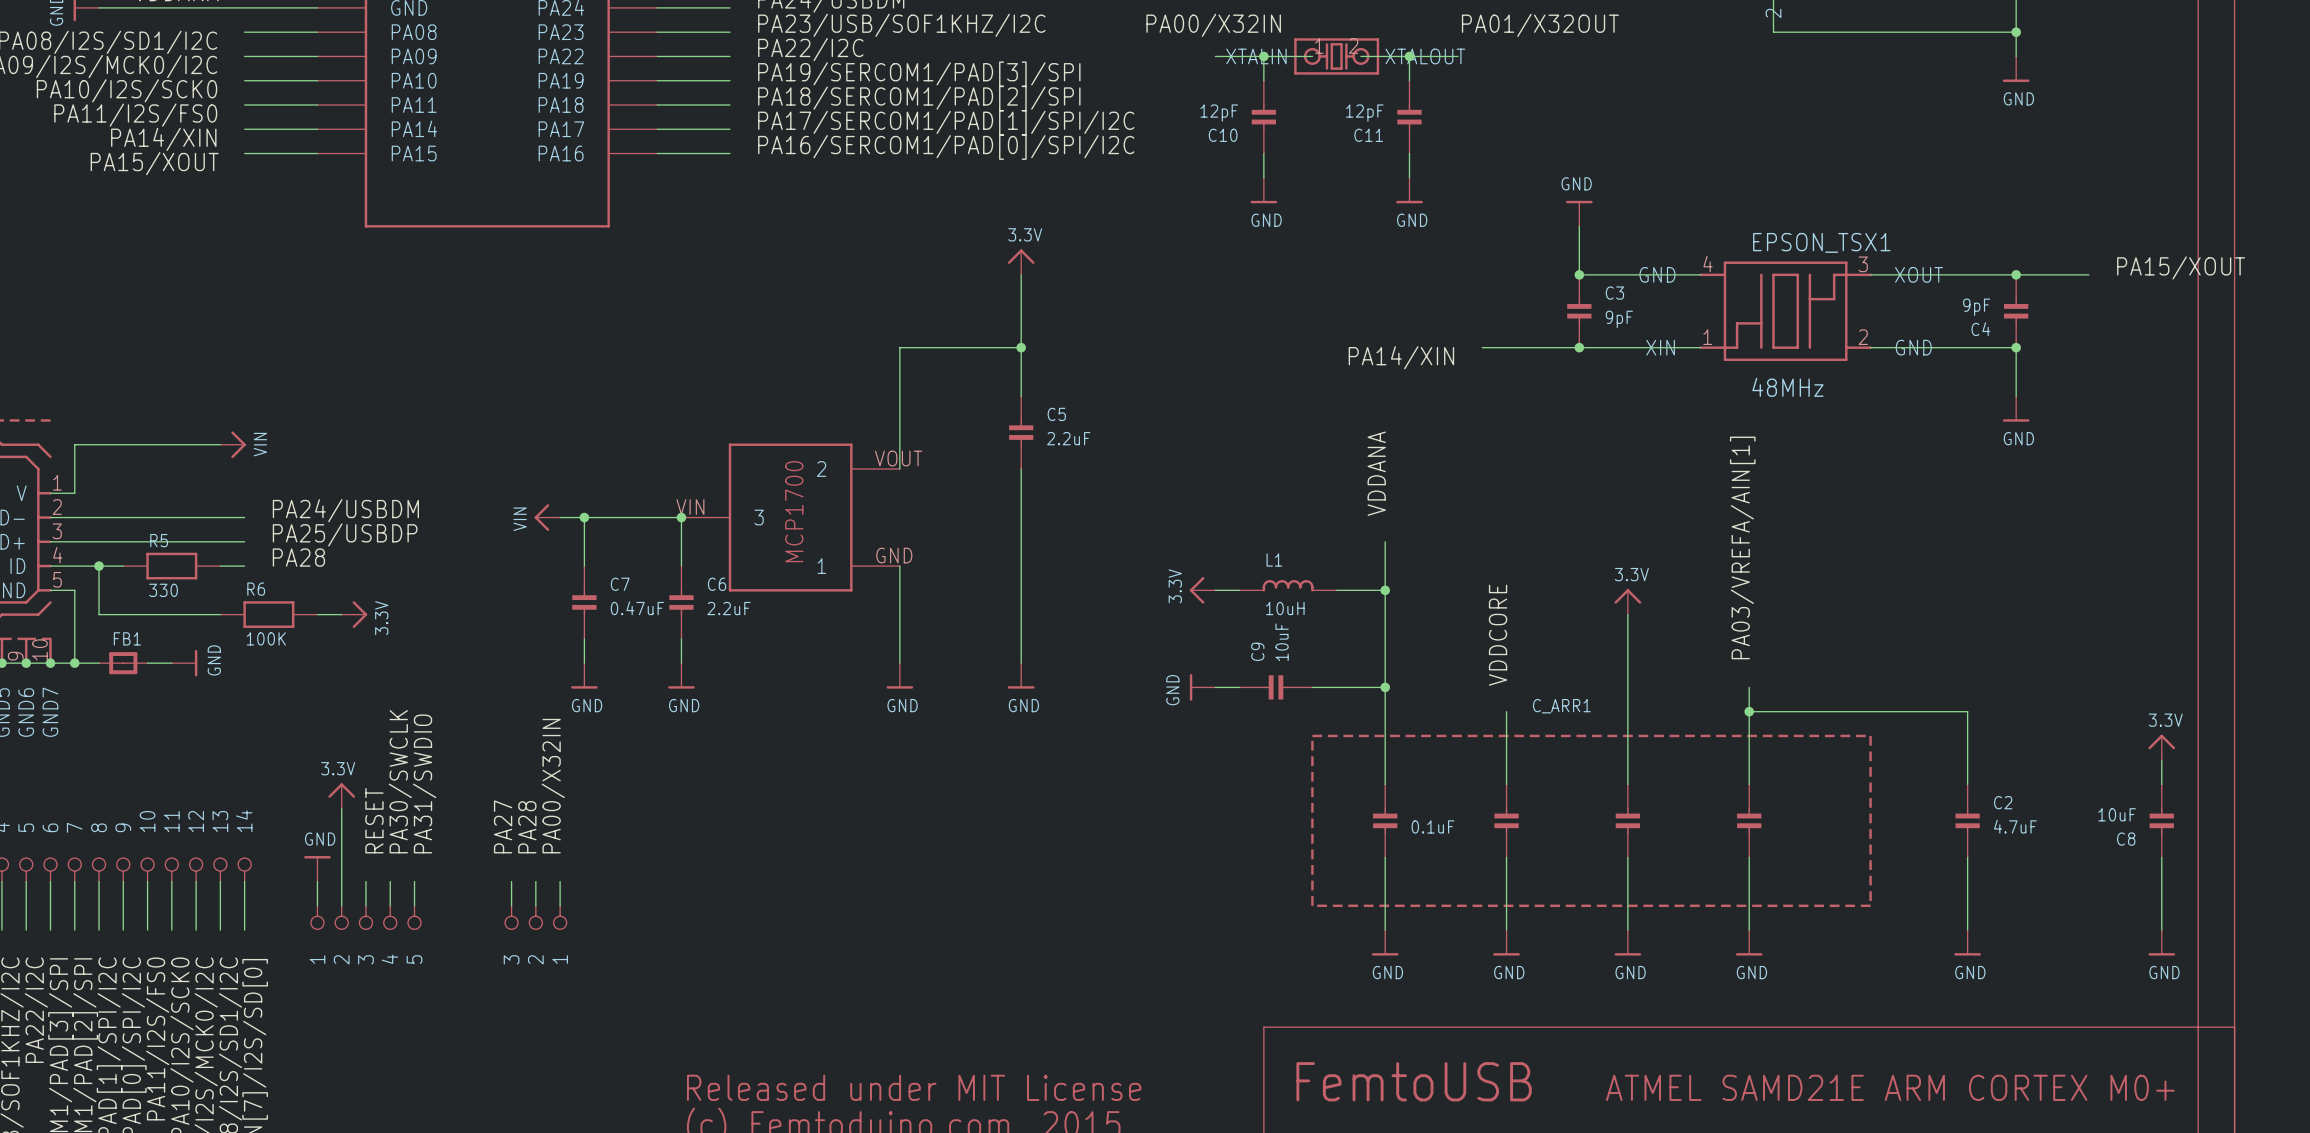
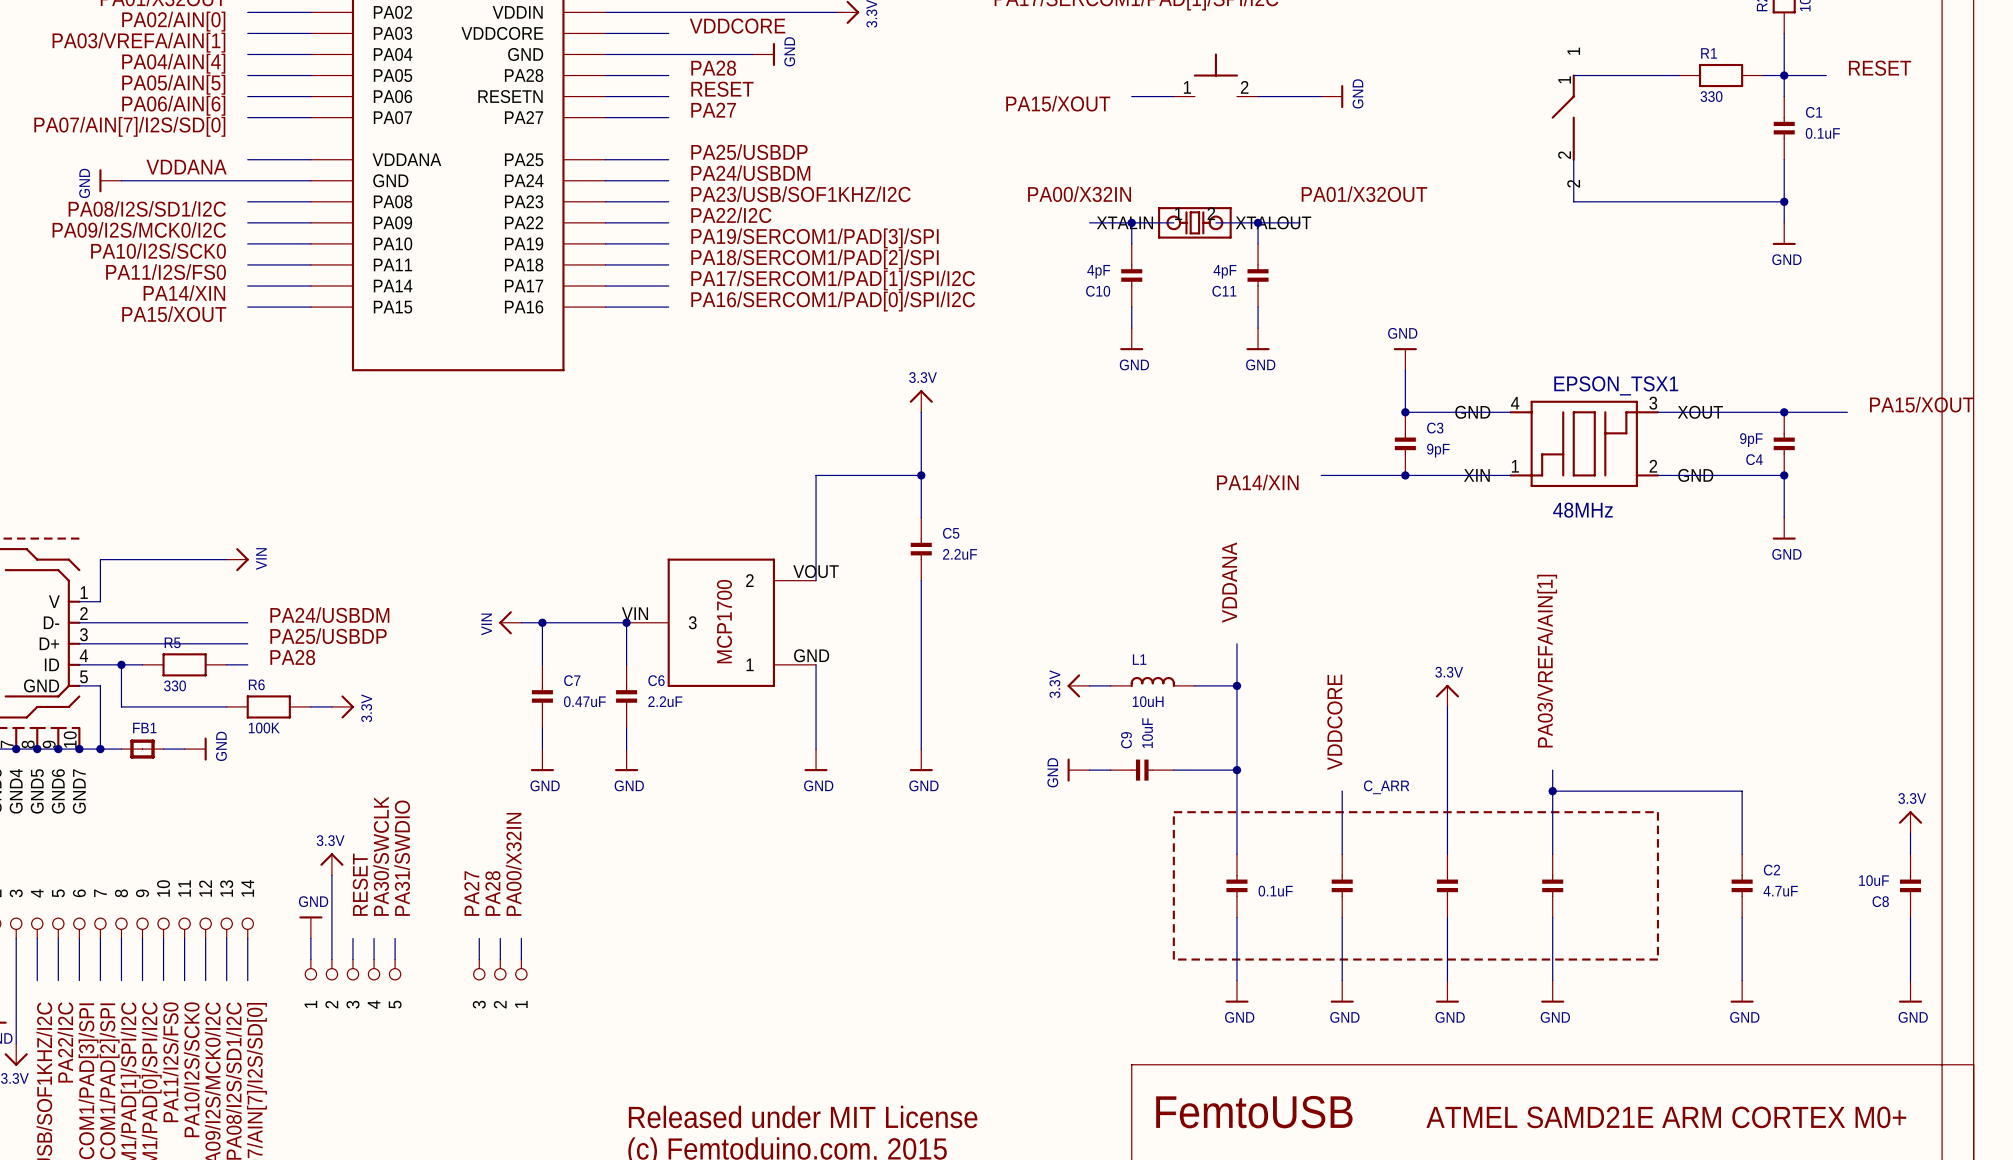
C10 value: 12pF (1219, 113) -> 4pF (1098, 271)
C11 value: 12pF (1364, 113) -> 4pF (1225, 271)
C_ARR1 name: C_ARR1 (1561, 706) -> C_ARR (1386, 787)

